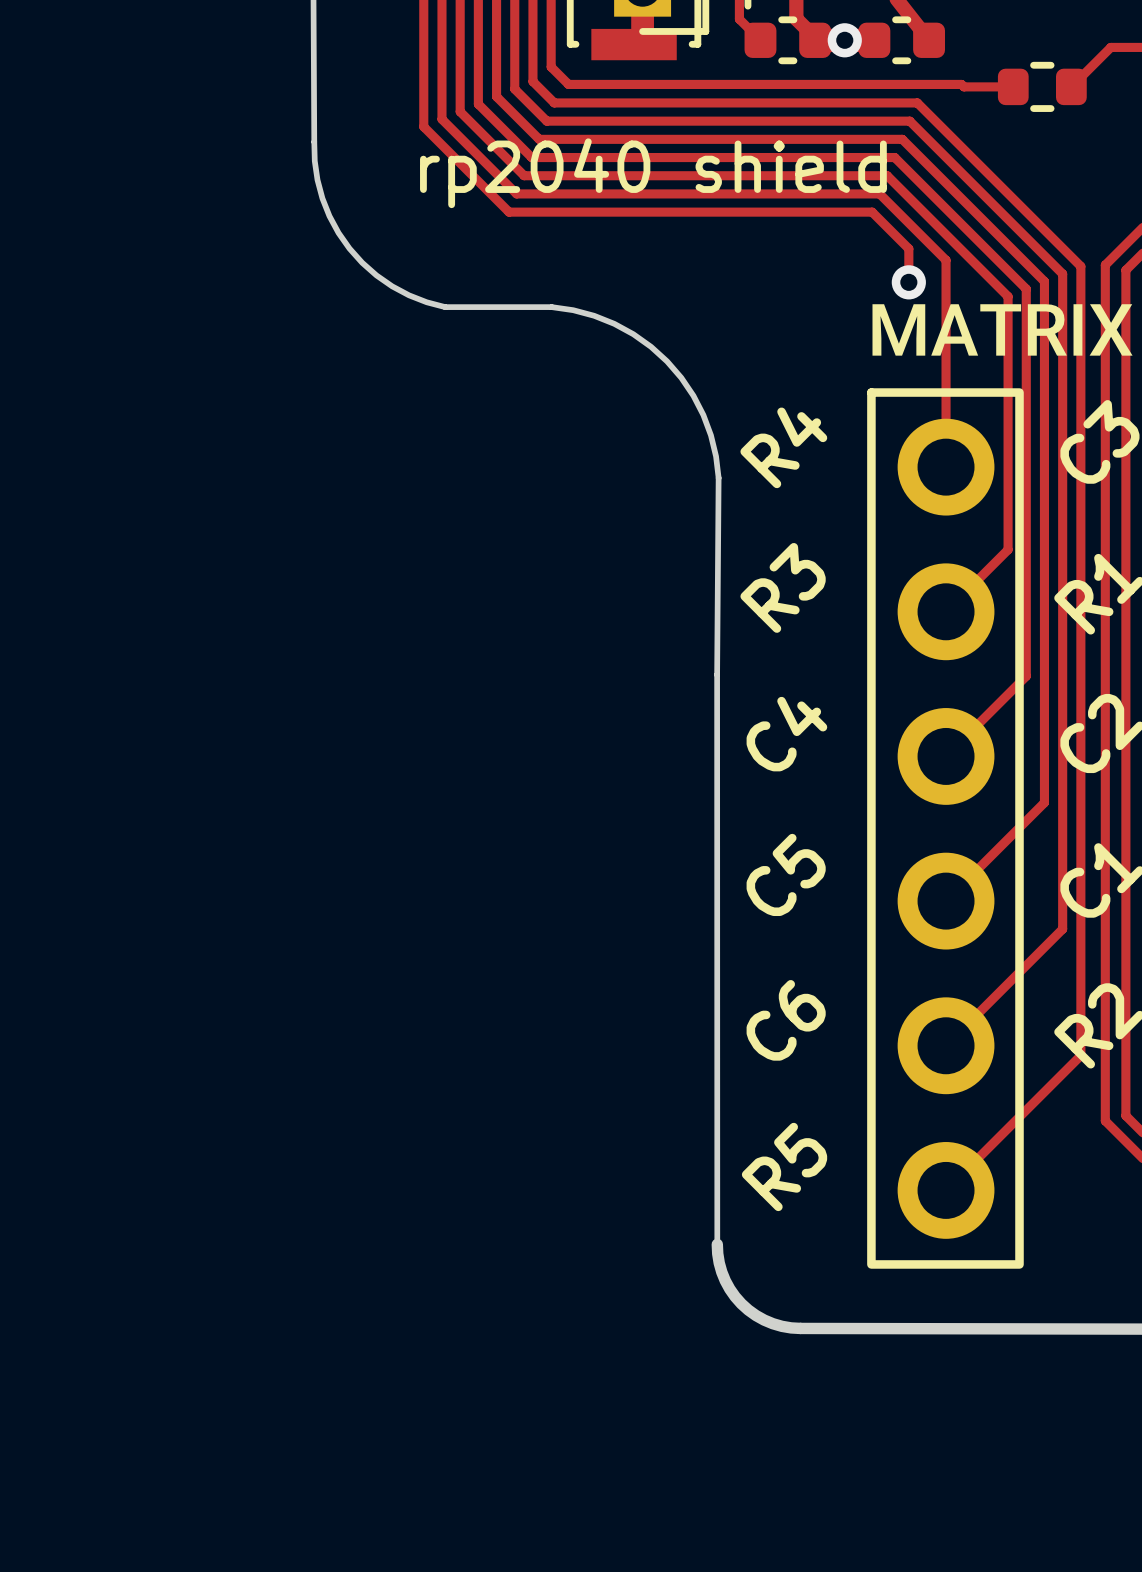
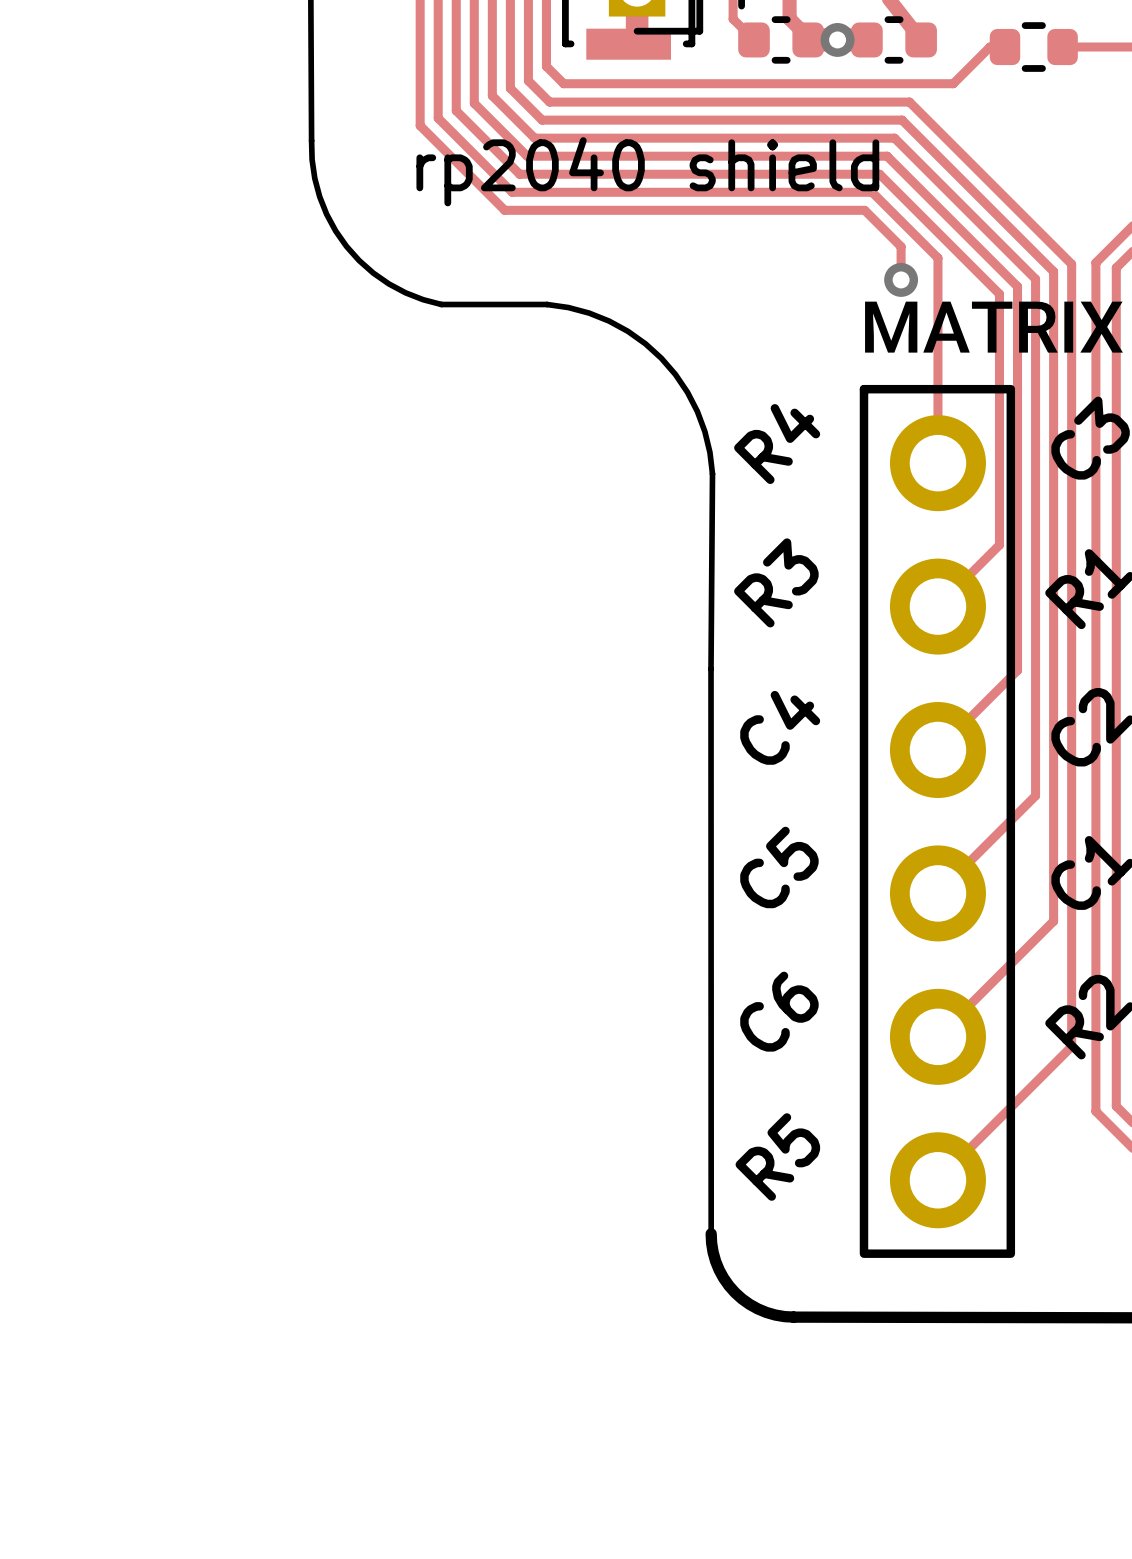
track: (1110, 47) (1071, 86) -> (1101, 47) (1062, 47)
track: (961, 84) (963, 86) (1013, 86) -> (953, 83) (990, 47) (1004, 47)
part position: (1042, 86) -> (1033, 47)

